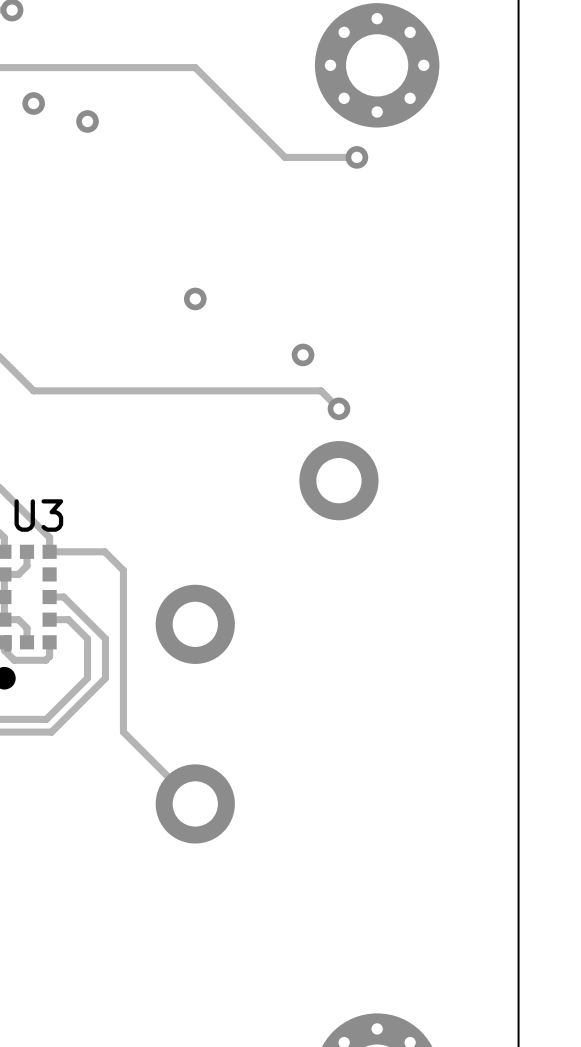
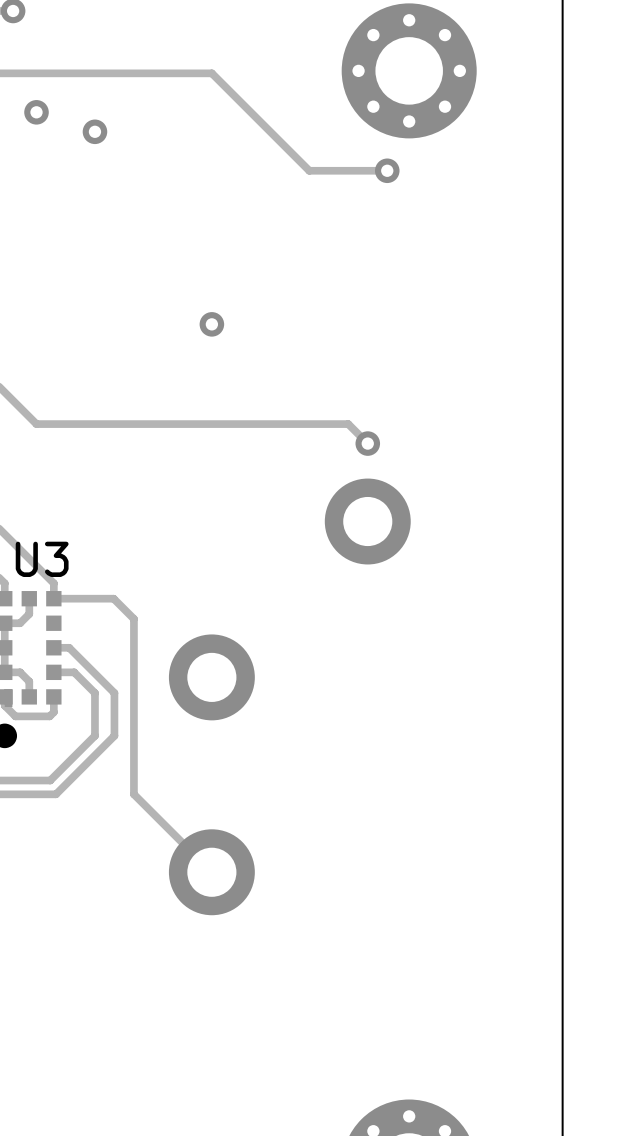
via: (303, 354) -> none

